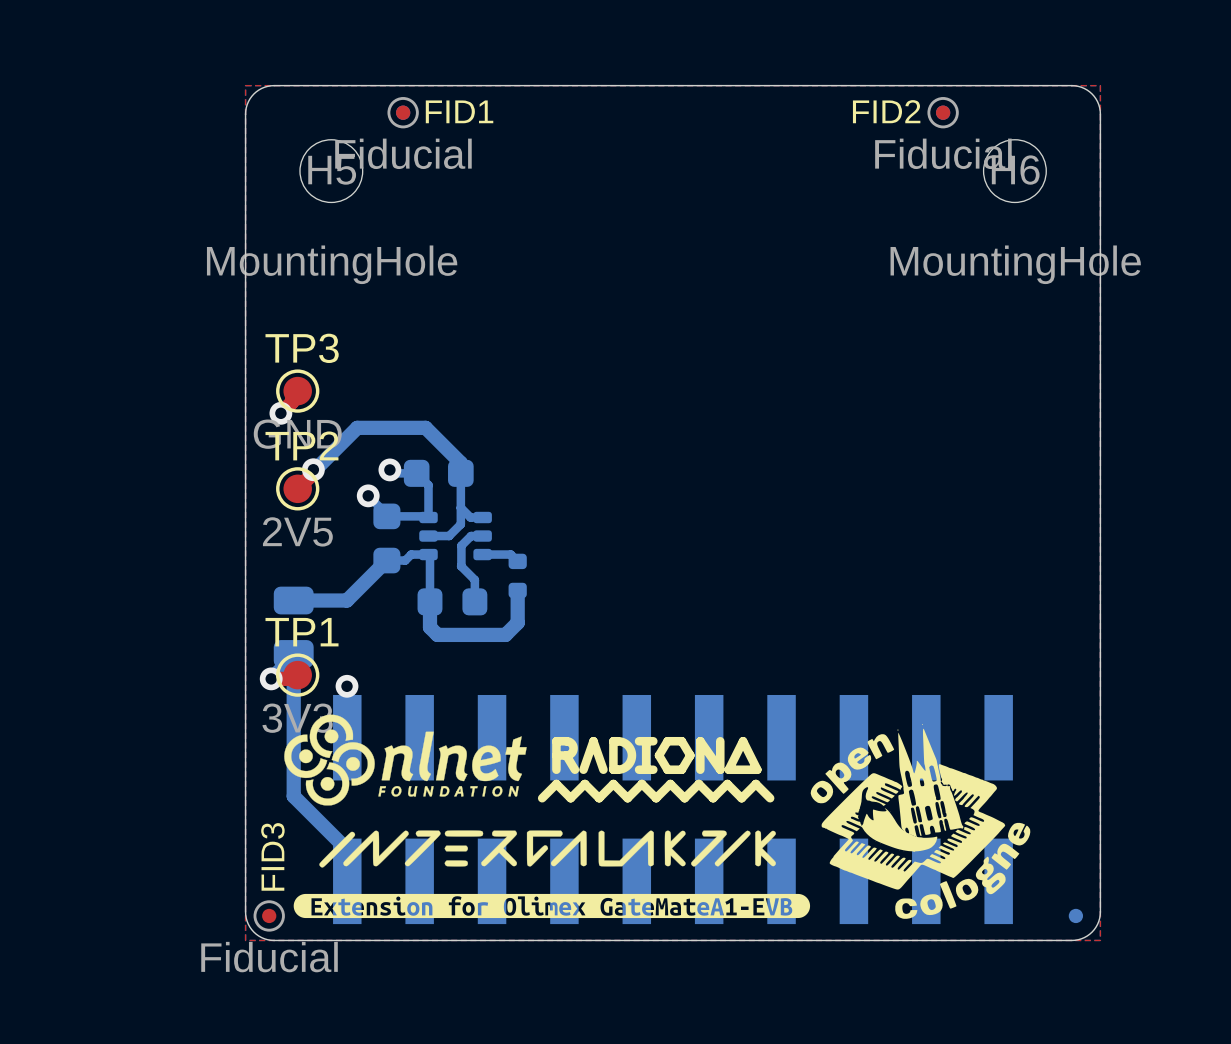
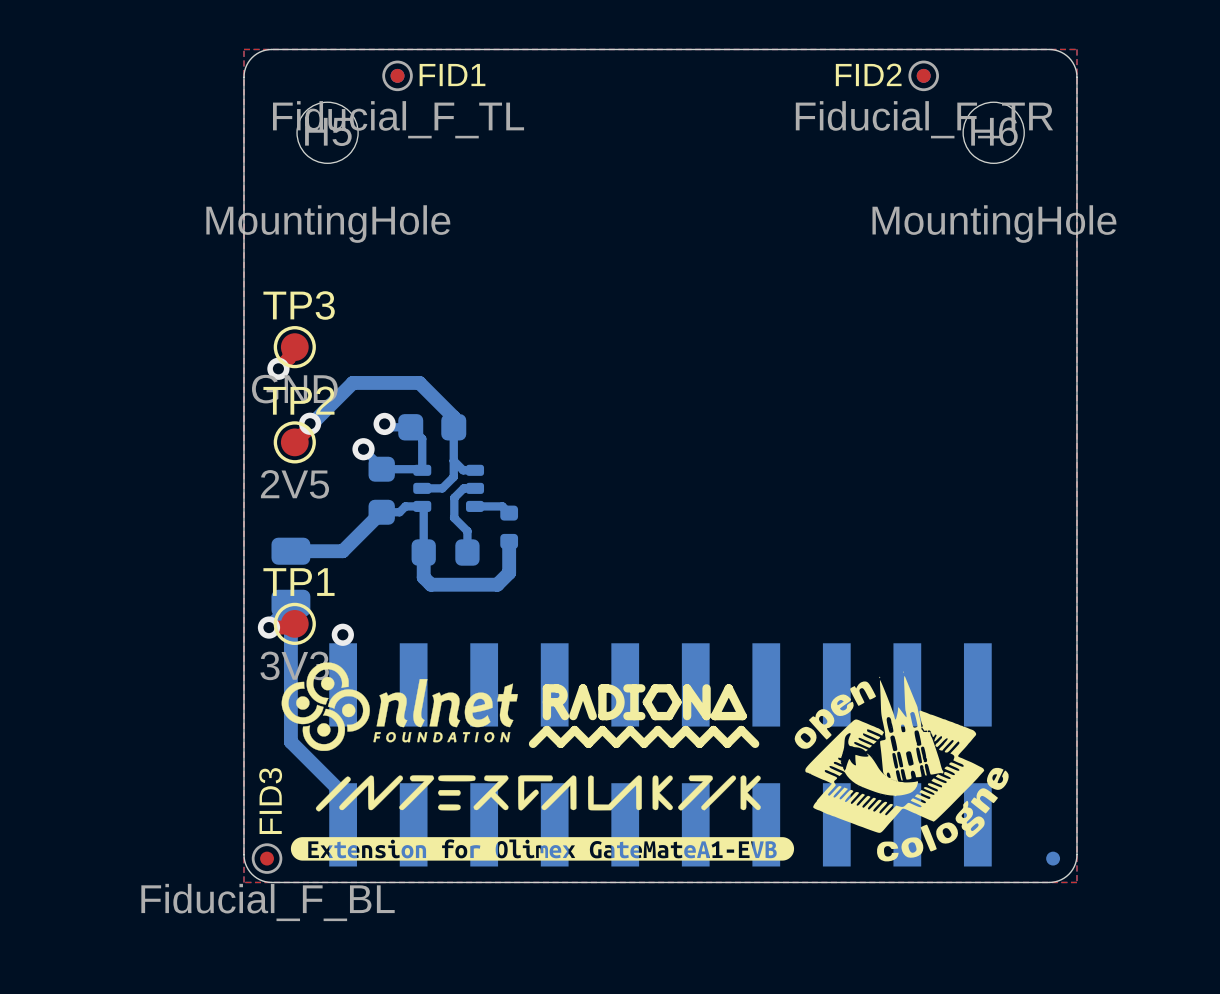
FID1 value: Fiducial (403, 153) -> Fiducial_F_TL (398, 119)
FID2 value: Fiducial (943, 153) -> Fiducial_F_TR (924, 119)
FID3 value: Fiducial (269, 957) -> Fiducial_F_BL (268, 902)

